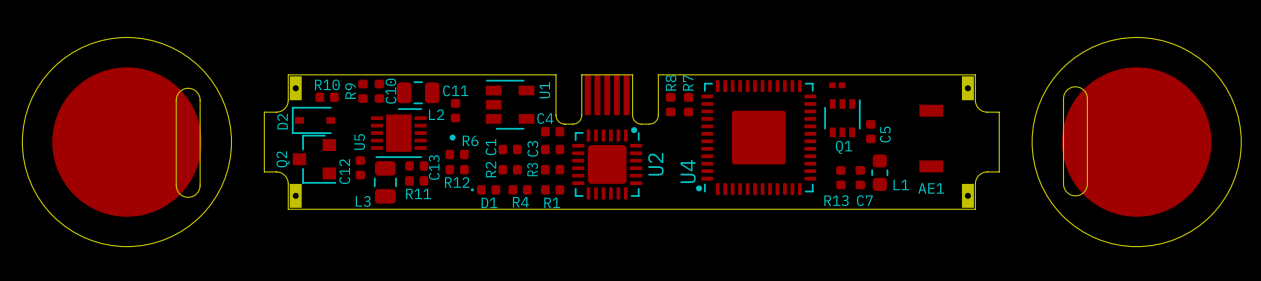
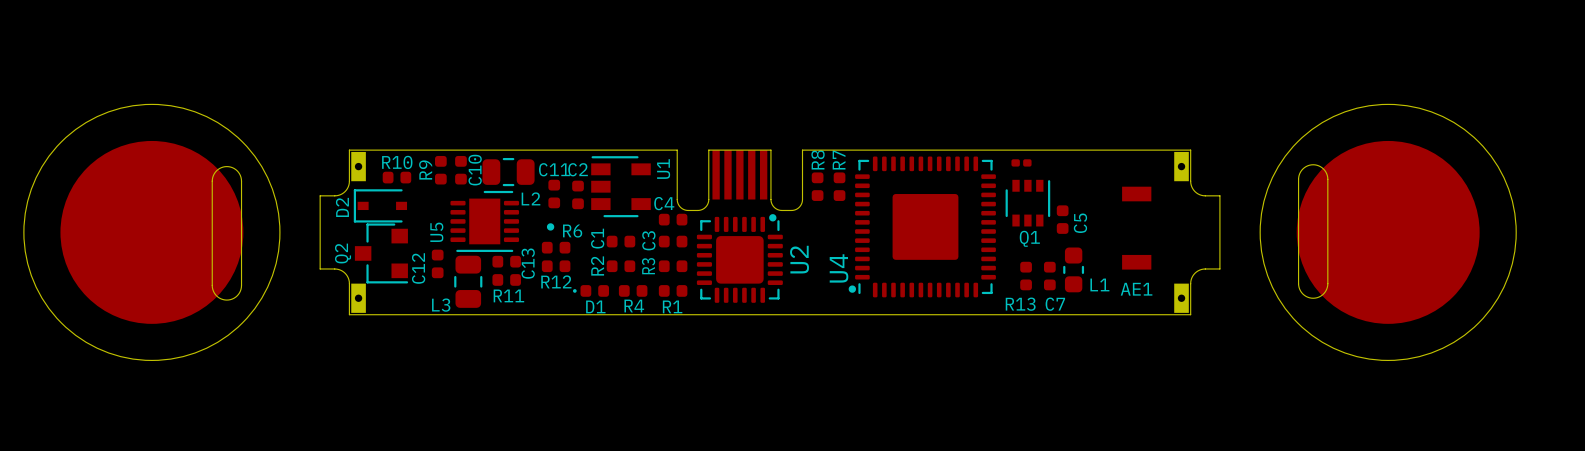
C2: none -> (578, 194)

